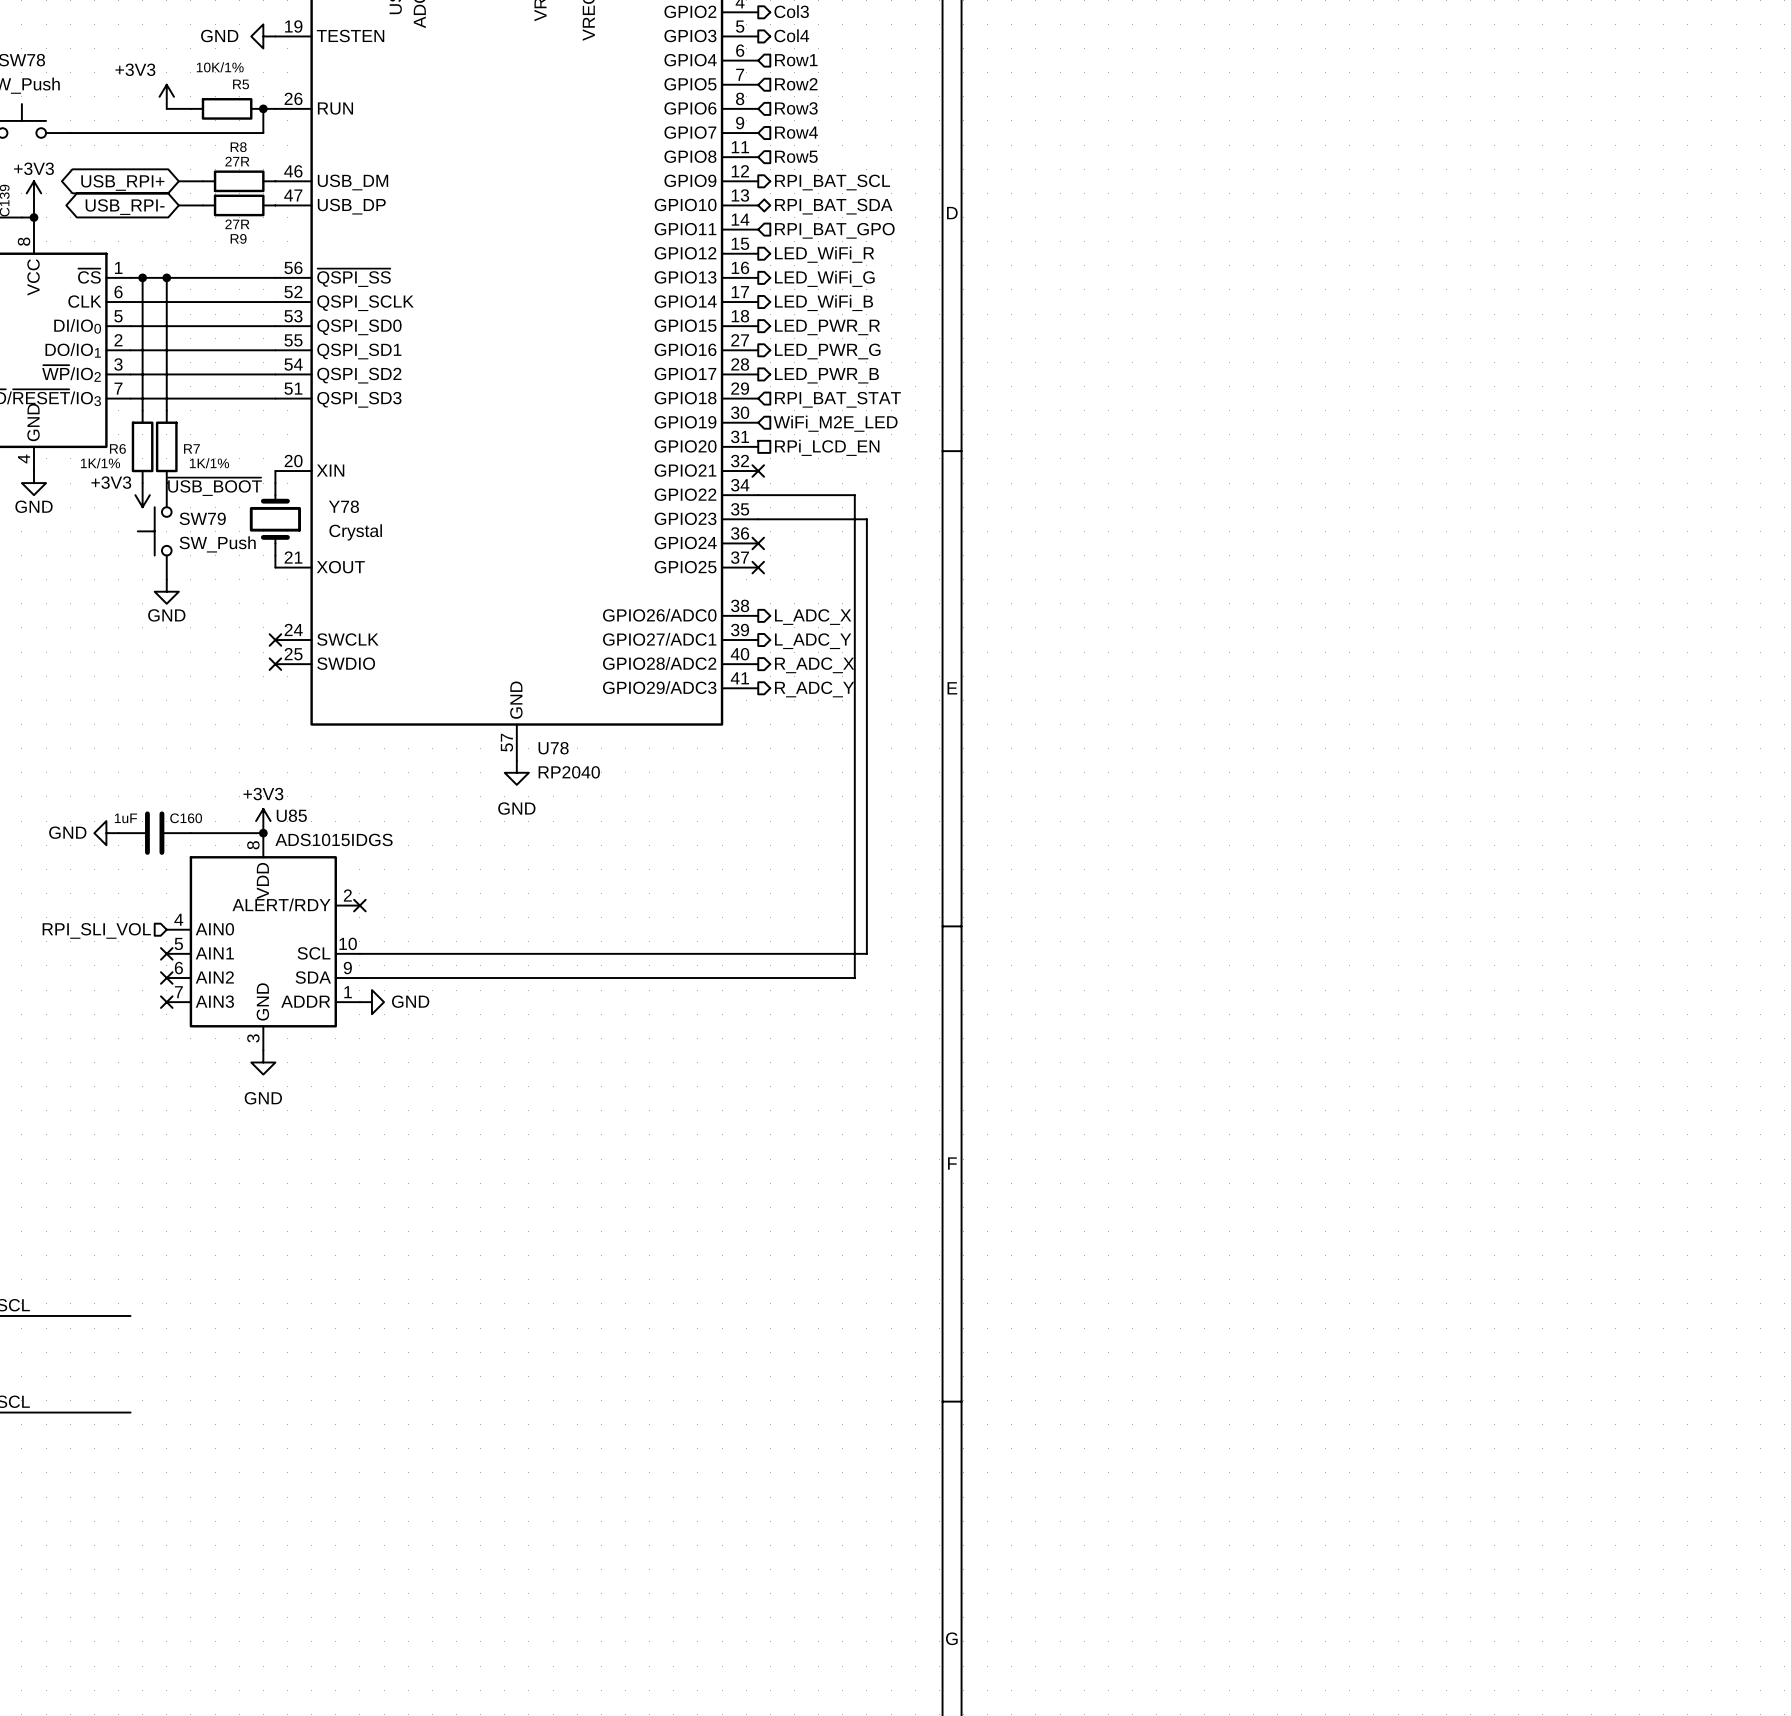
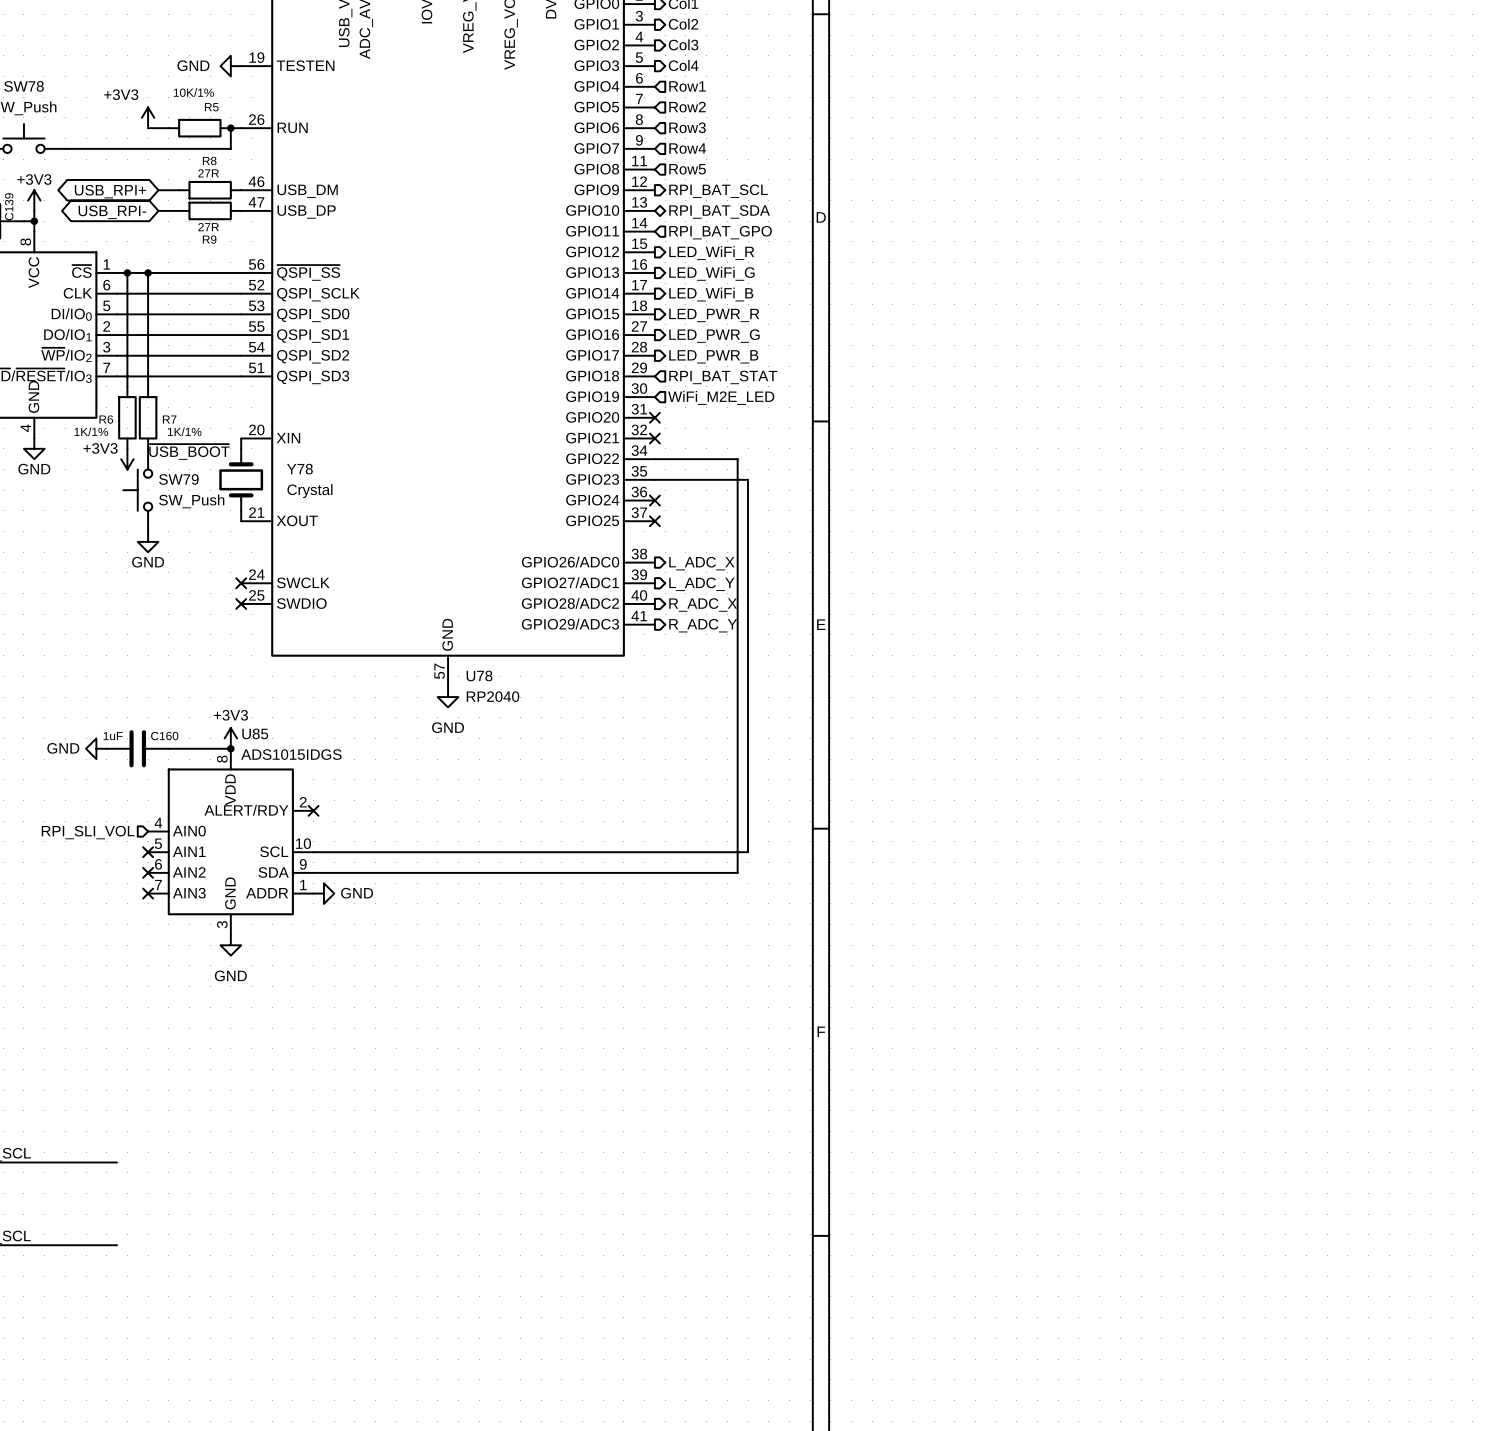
no-connect mark: none -> (654, 417)
hierarchical label: RPi_LCD_EN (827, 447) -> none

